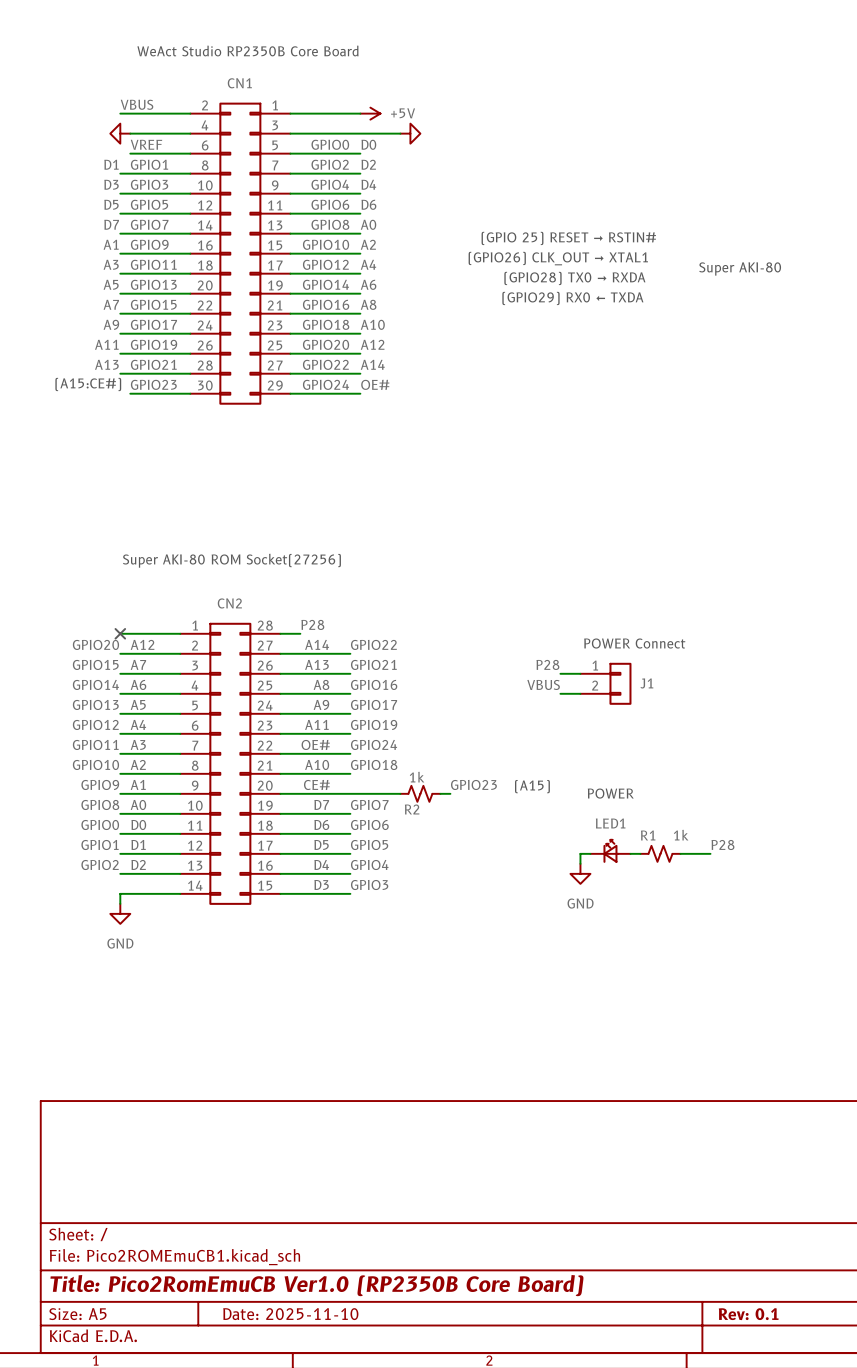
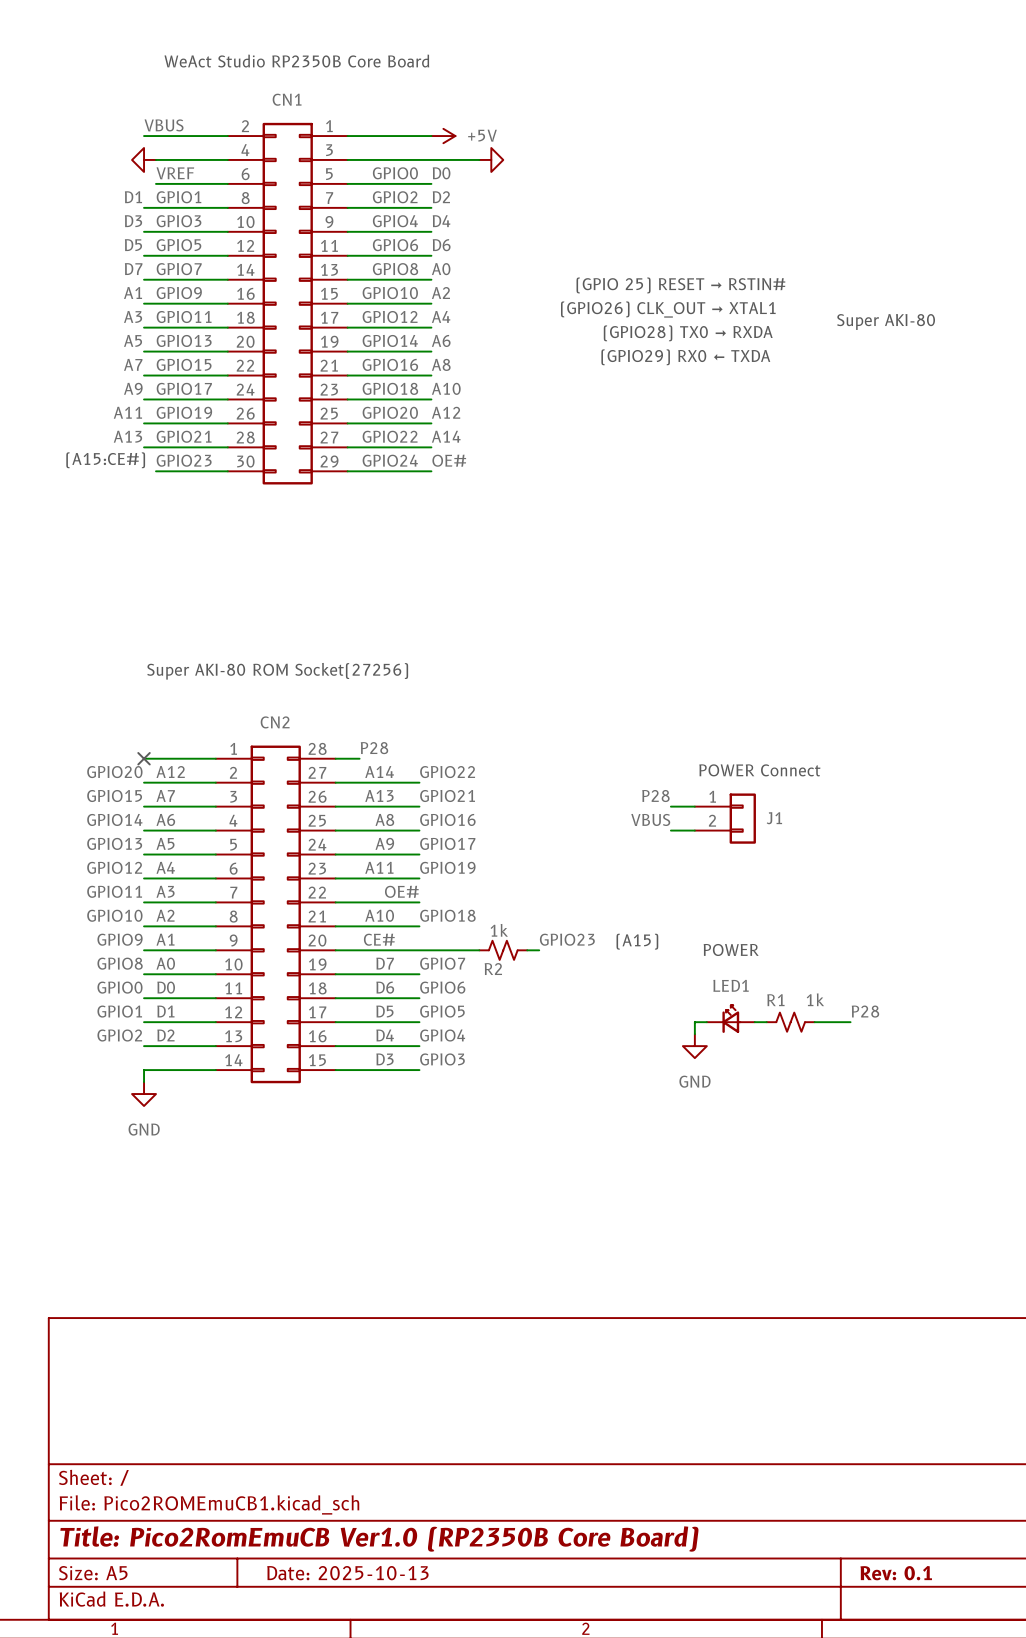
label: OE# (315, 744) -> none
label: GPIO24 (374, 744) -> OE# (401, 891)
title block: Date: 2025-11-10 (290, 1314) -> Date: 2025-10-13 (347, 1573)

